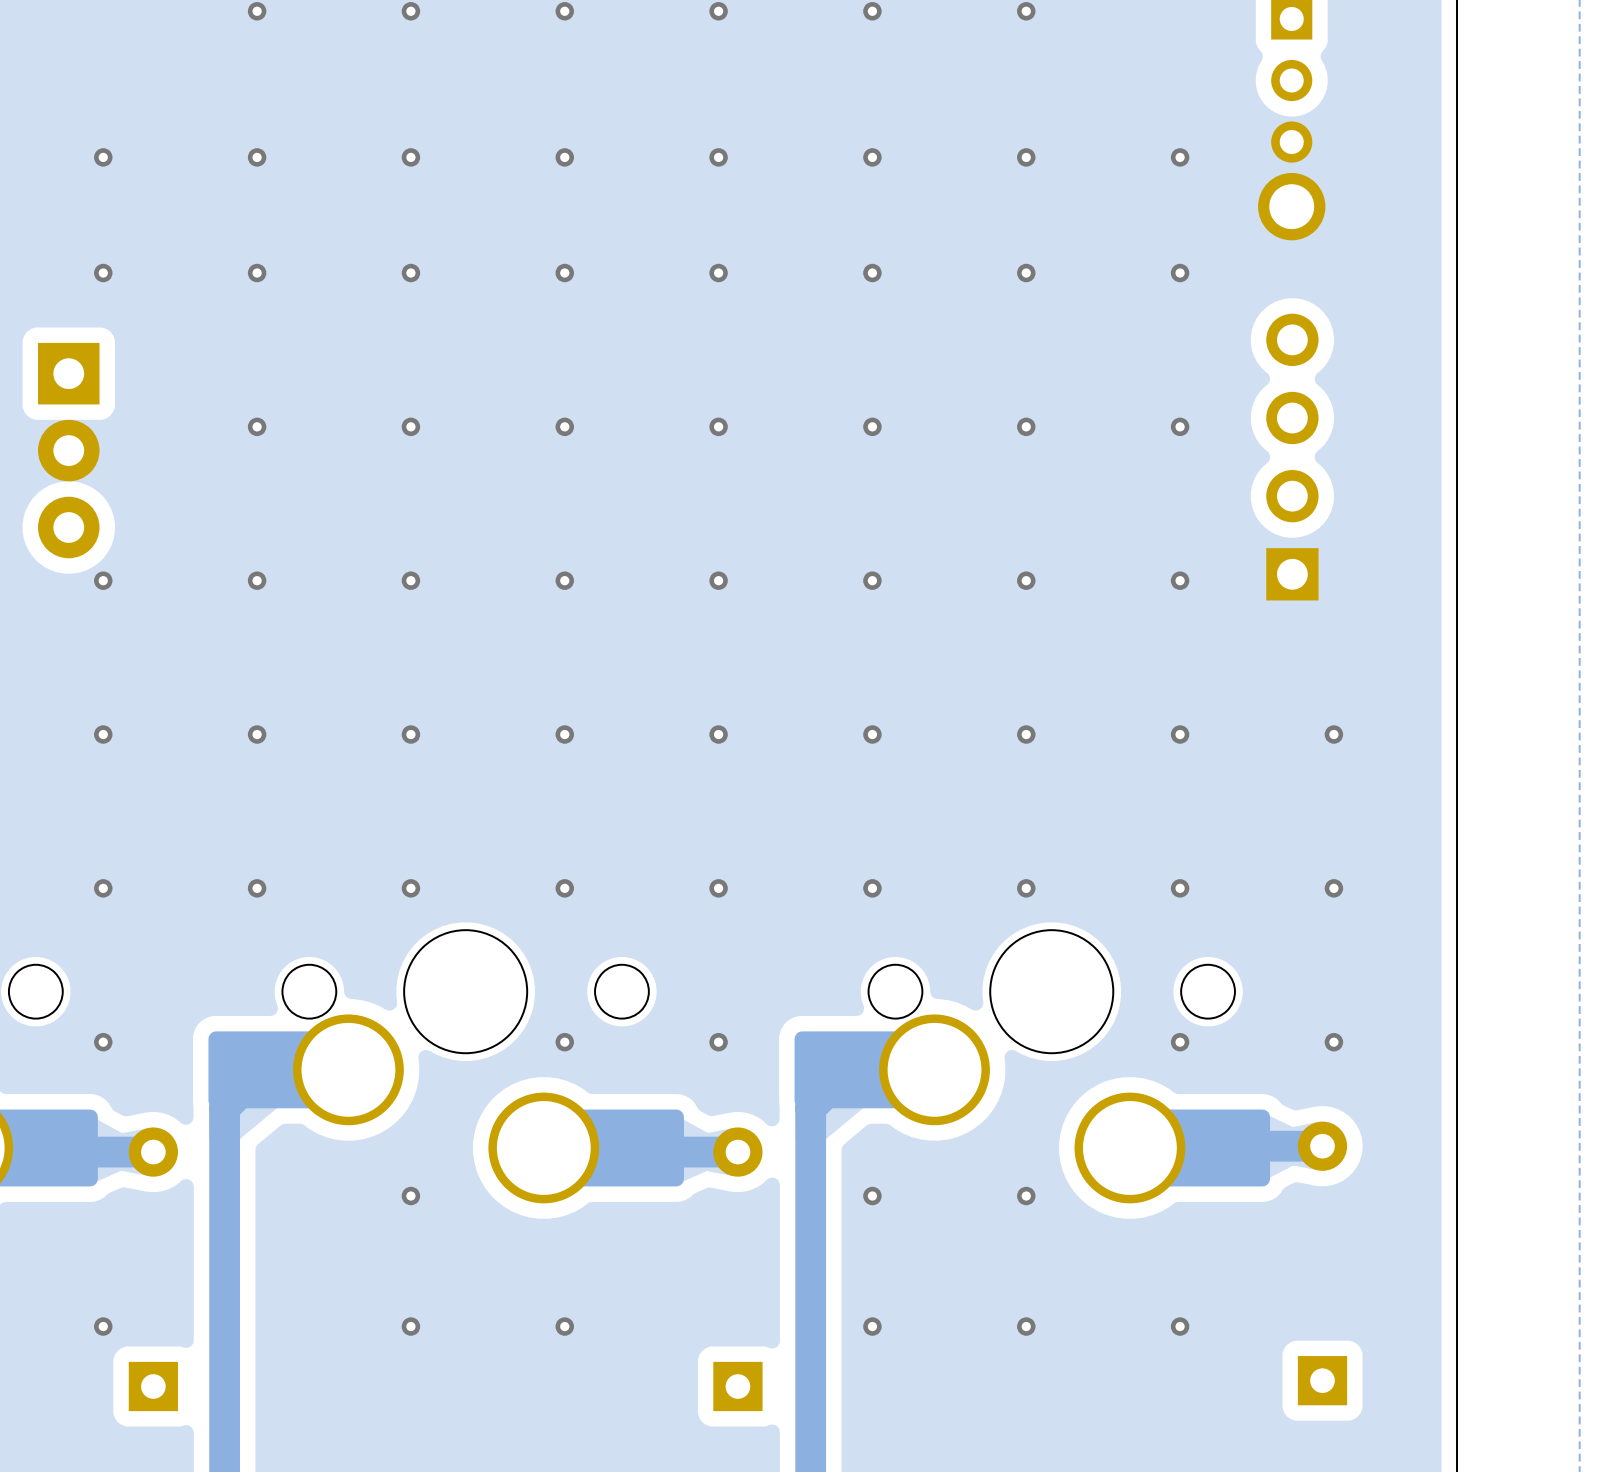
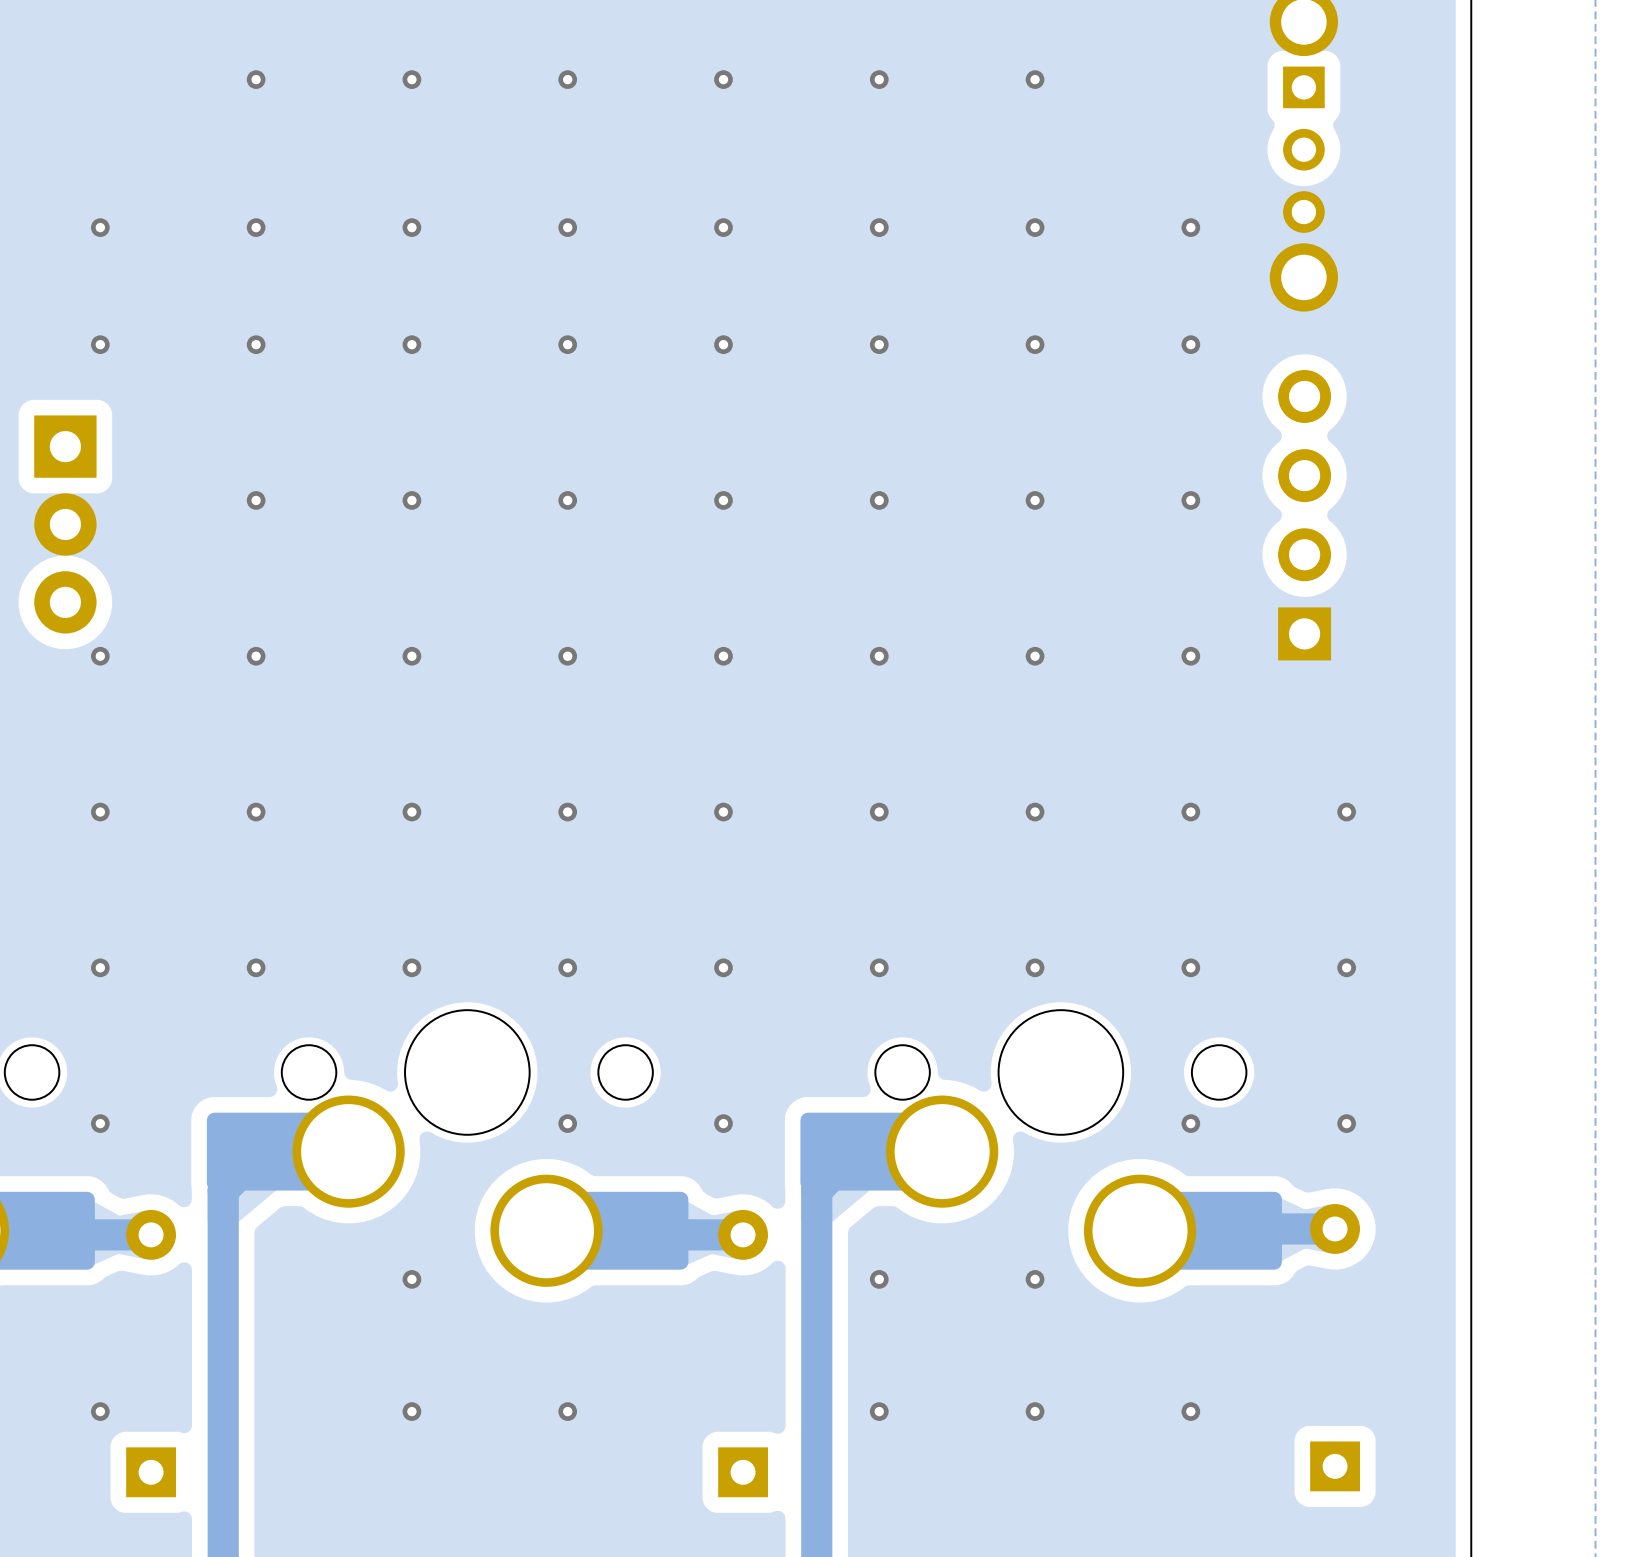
part position: (1292, 457) -> (1304, 515)

